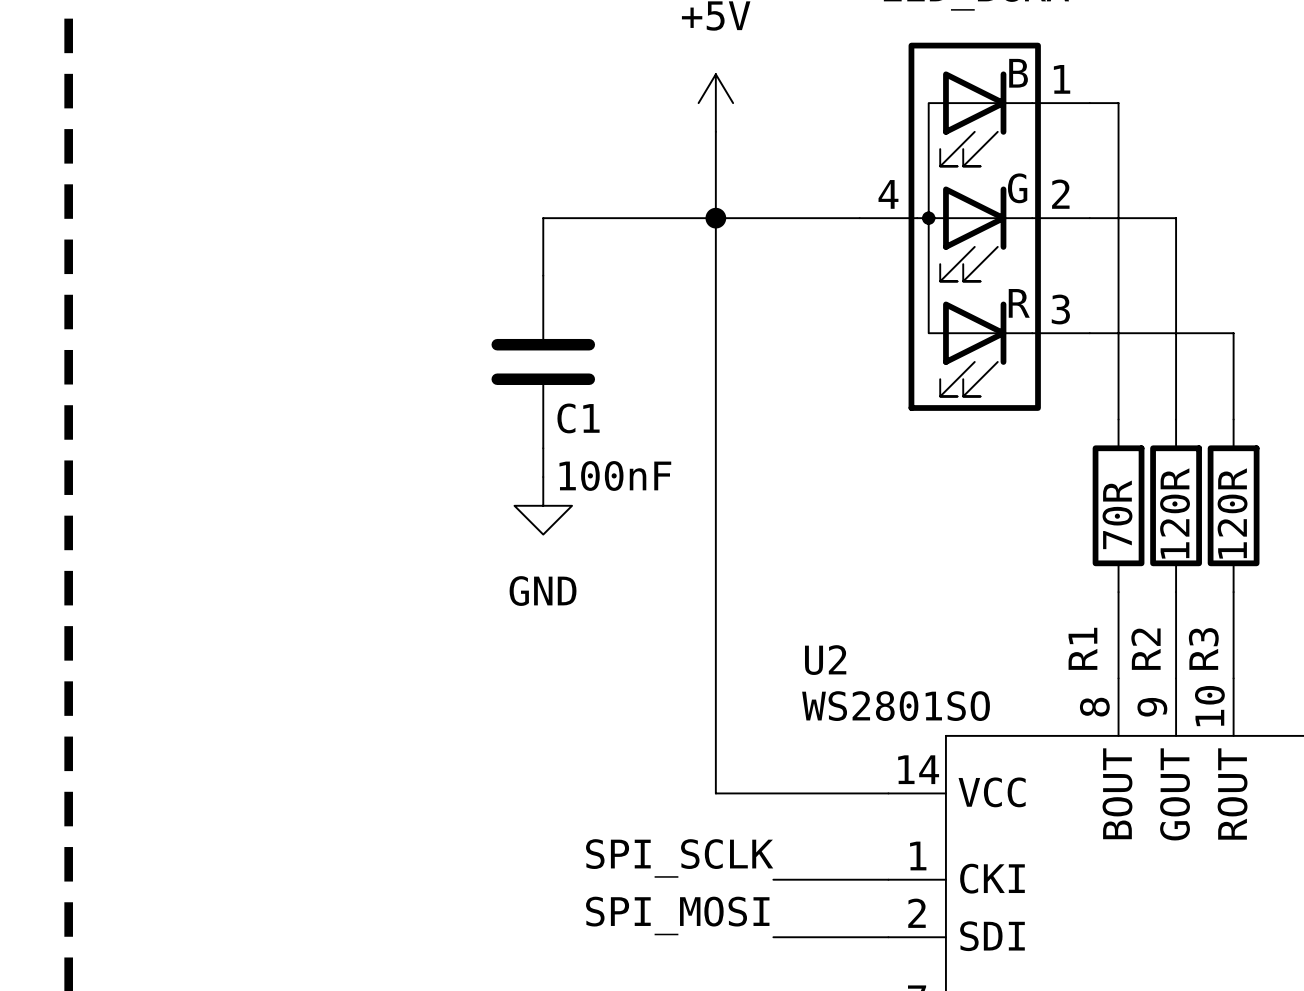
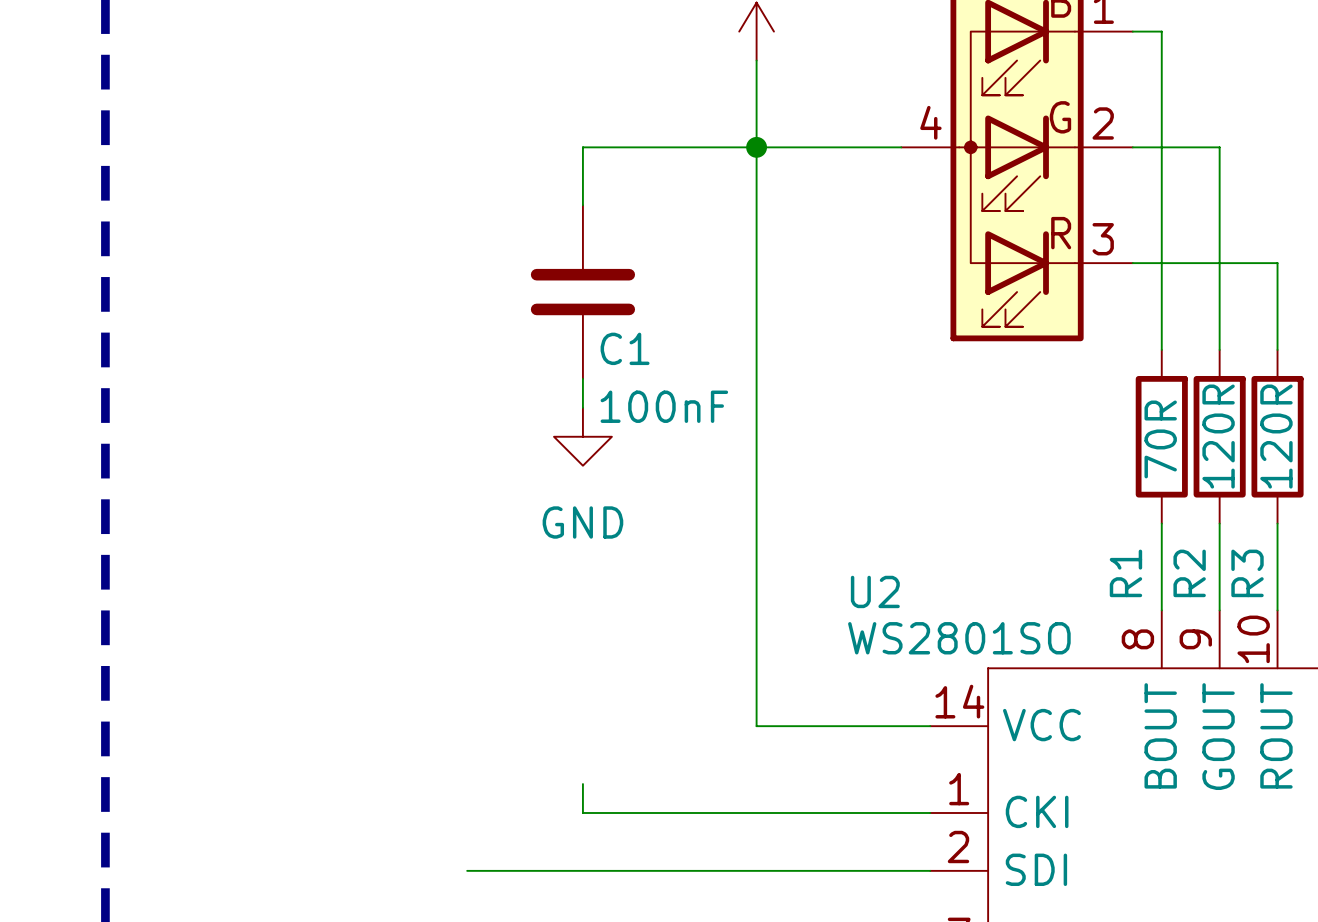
wire: none -> (582, 784) (582, 812) (814, 812)
label: SPI_SCLK (679, 858) -> none
label: SPI_MOSI (677, 915) -> none
wire: none -> (467, 870) (814, 870)

